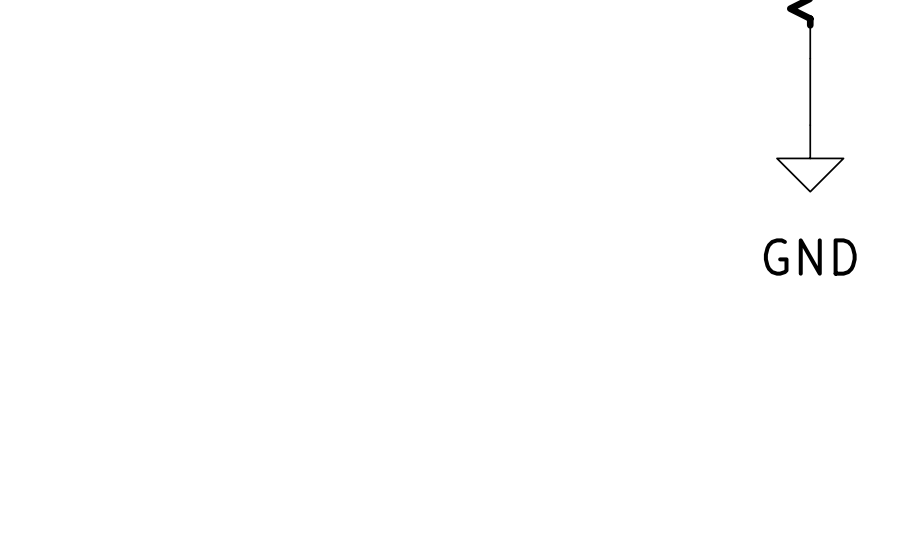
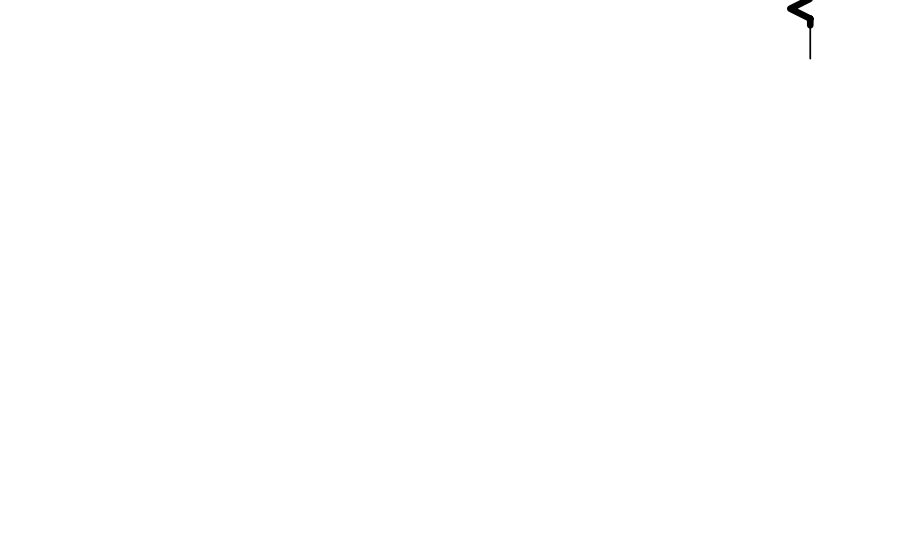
wire: (810, 58) (810, 125) -> none
power symbol: GND (810, 158) -> none

